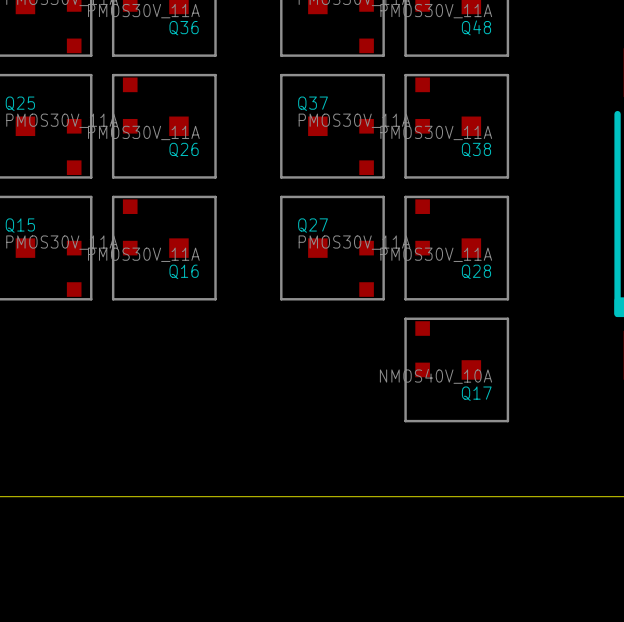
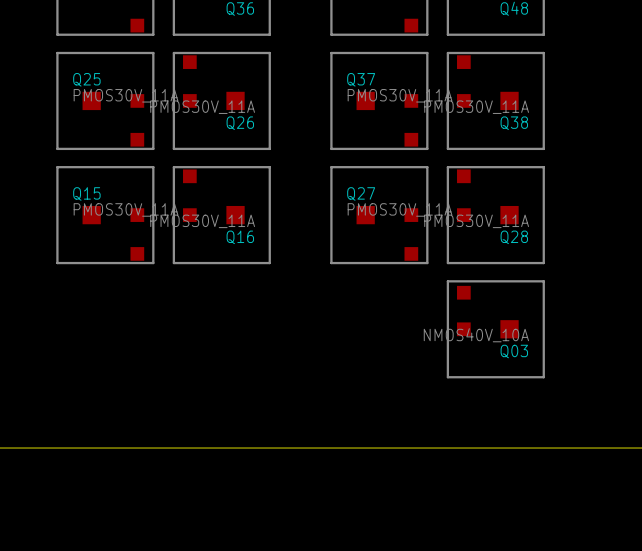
Q17: NMOS40V_10A (456, 369) -> none
Q03: none -> NMOS40V_10A (495, 329)

